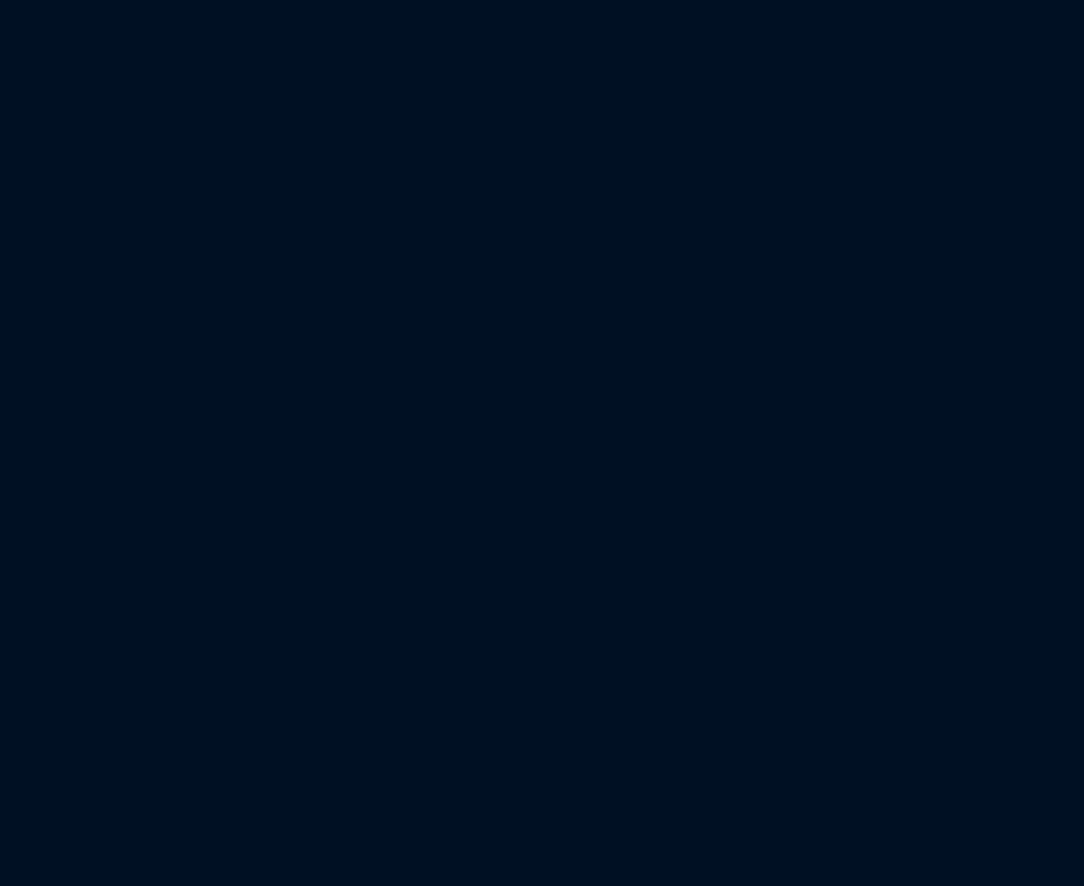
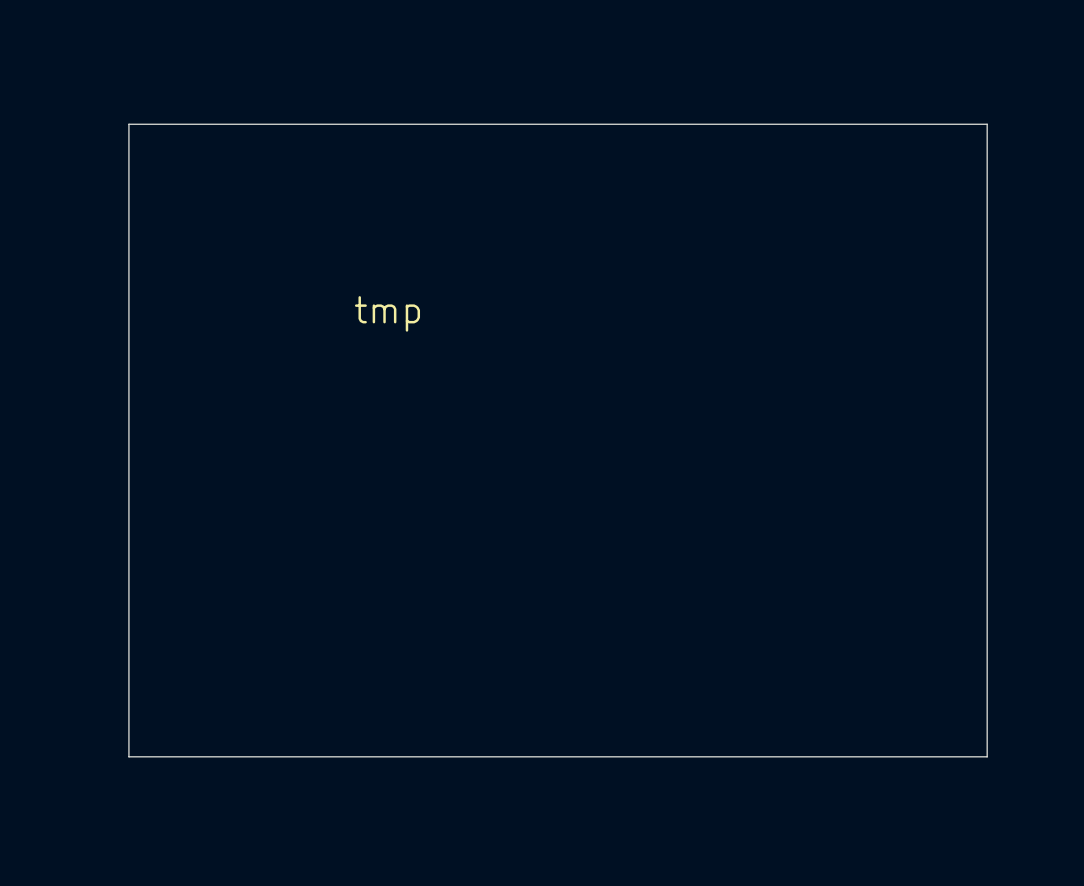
board edge: none -> (128, 124) (987, 124) (987, 756) (128, 756) (128, 124)
text: none -> tmp (387, 313)

